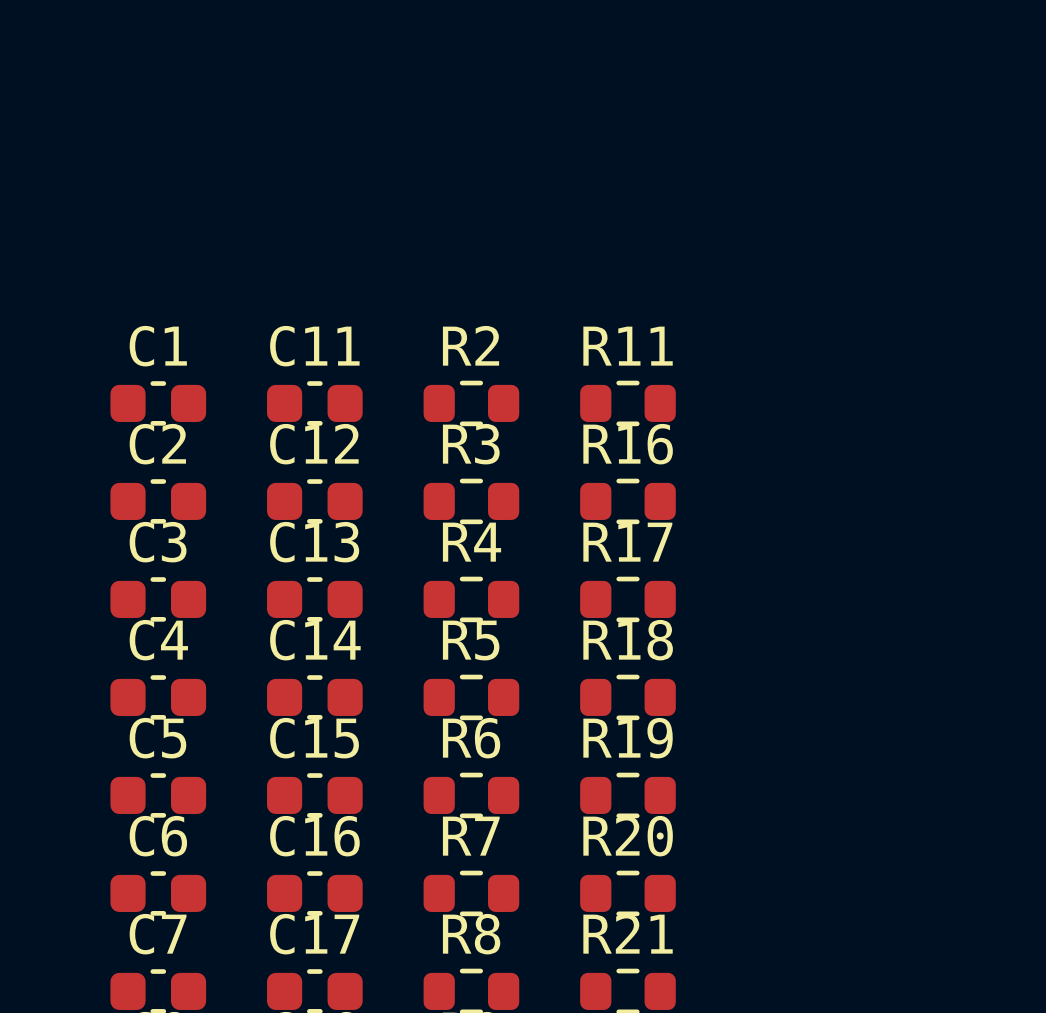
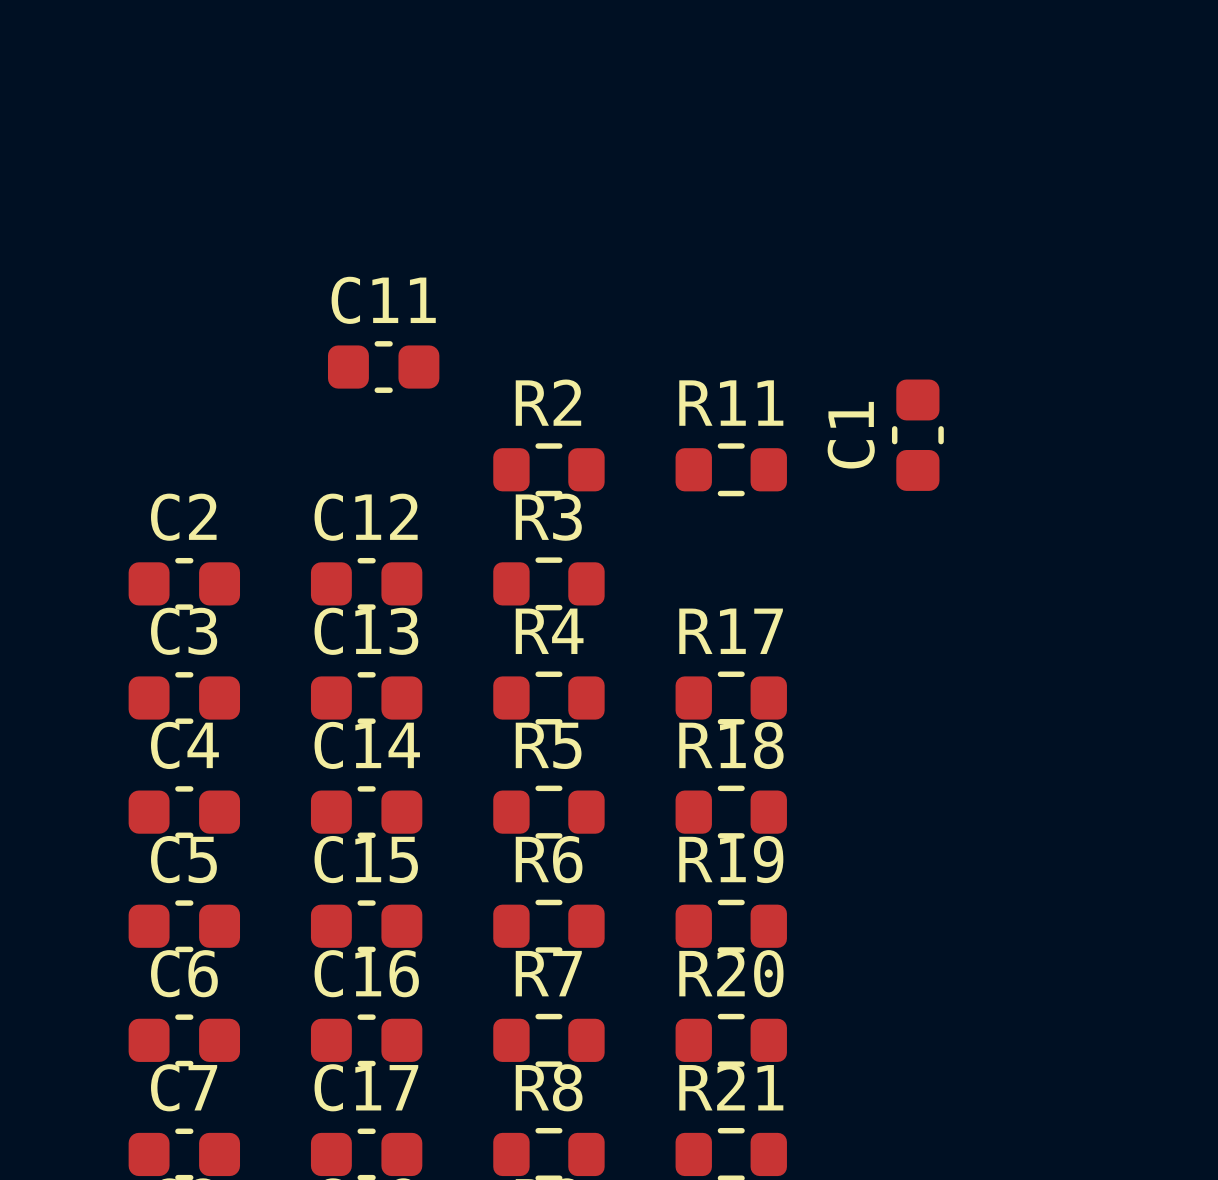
C1 name position: C1 (158, 346) -> C1 (851, 435)
C1 rotation: 0° (158, 403) -> 90° clockwise (917, 435)
C1 position: (158, 403) -> (917, 435)
C11 position: (314, 403) -> (383, 367)
R16: (627, 501) -> none

